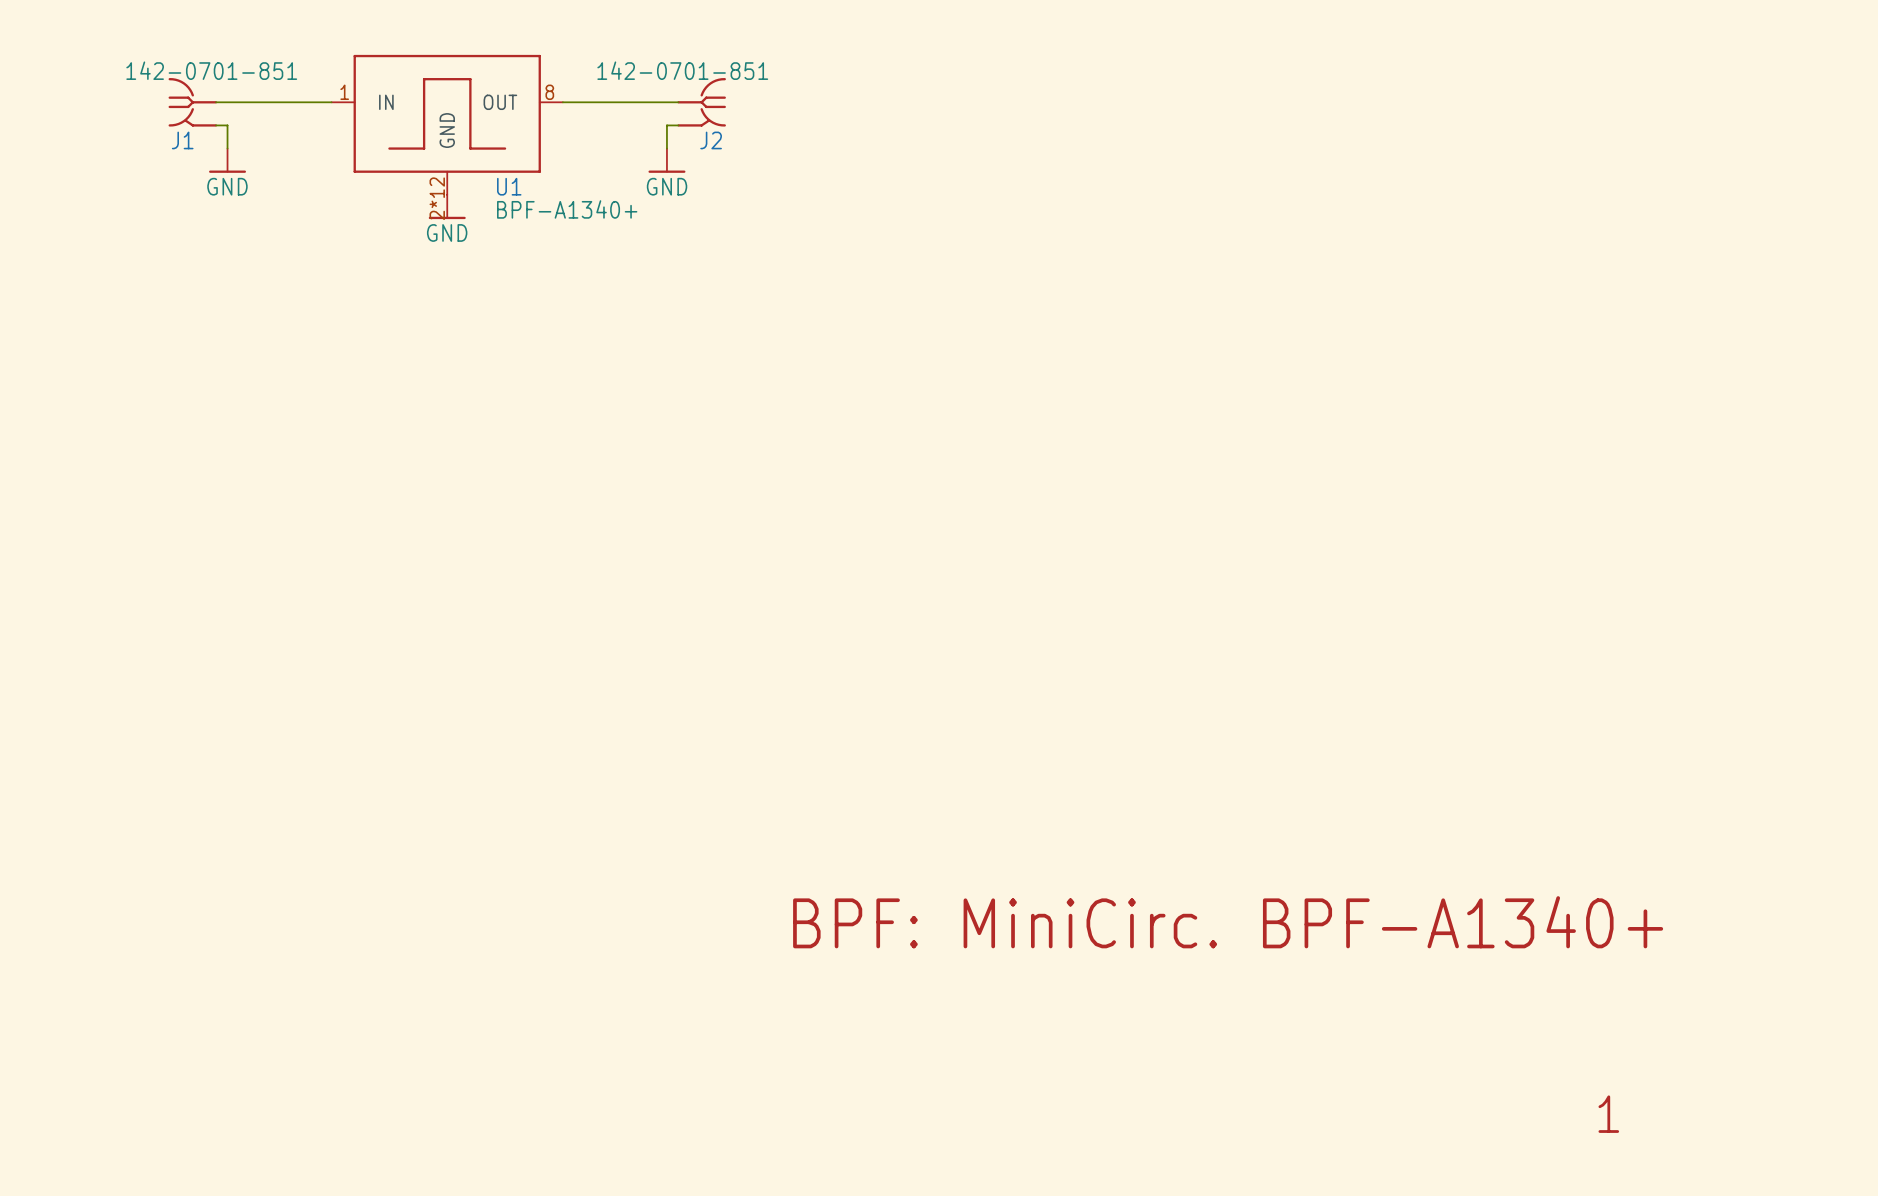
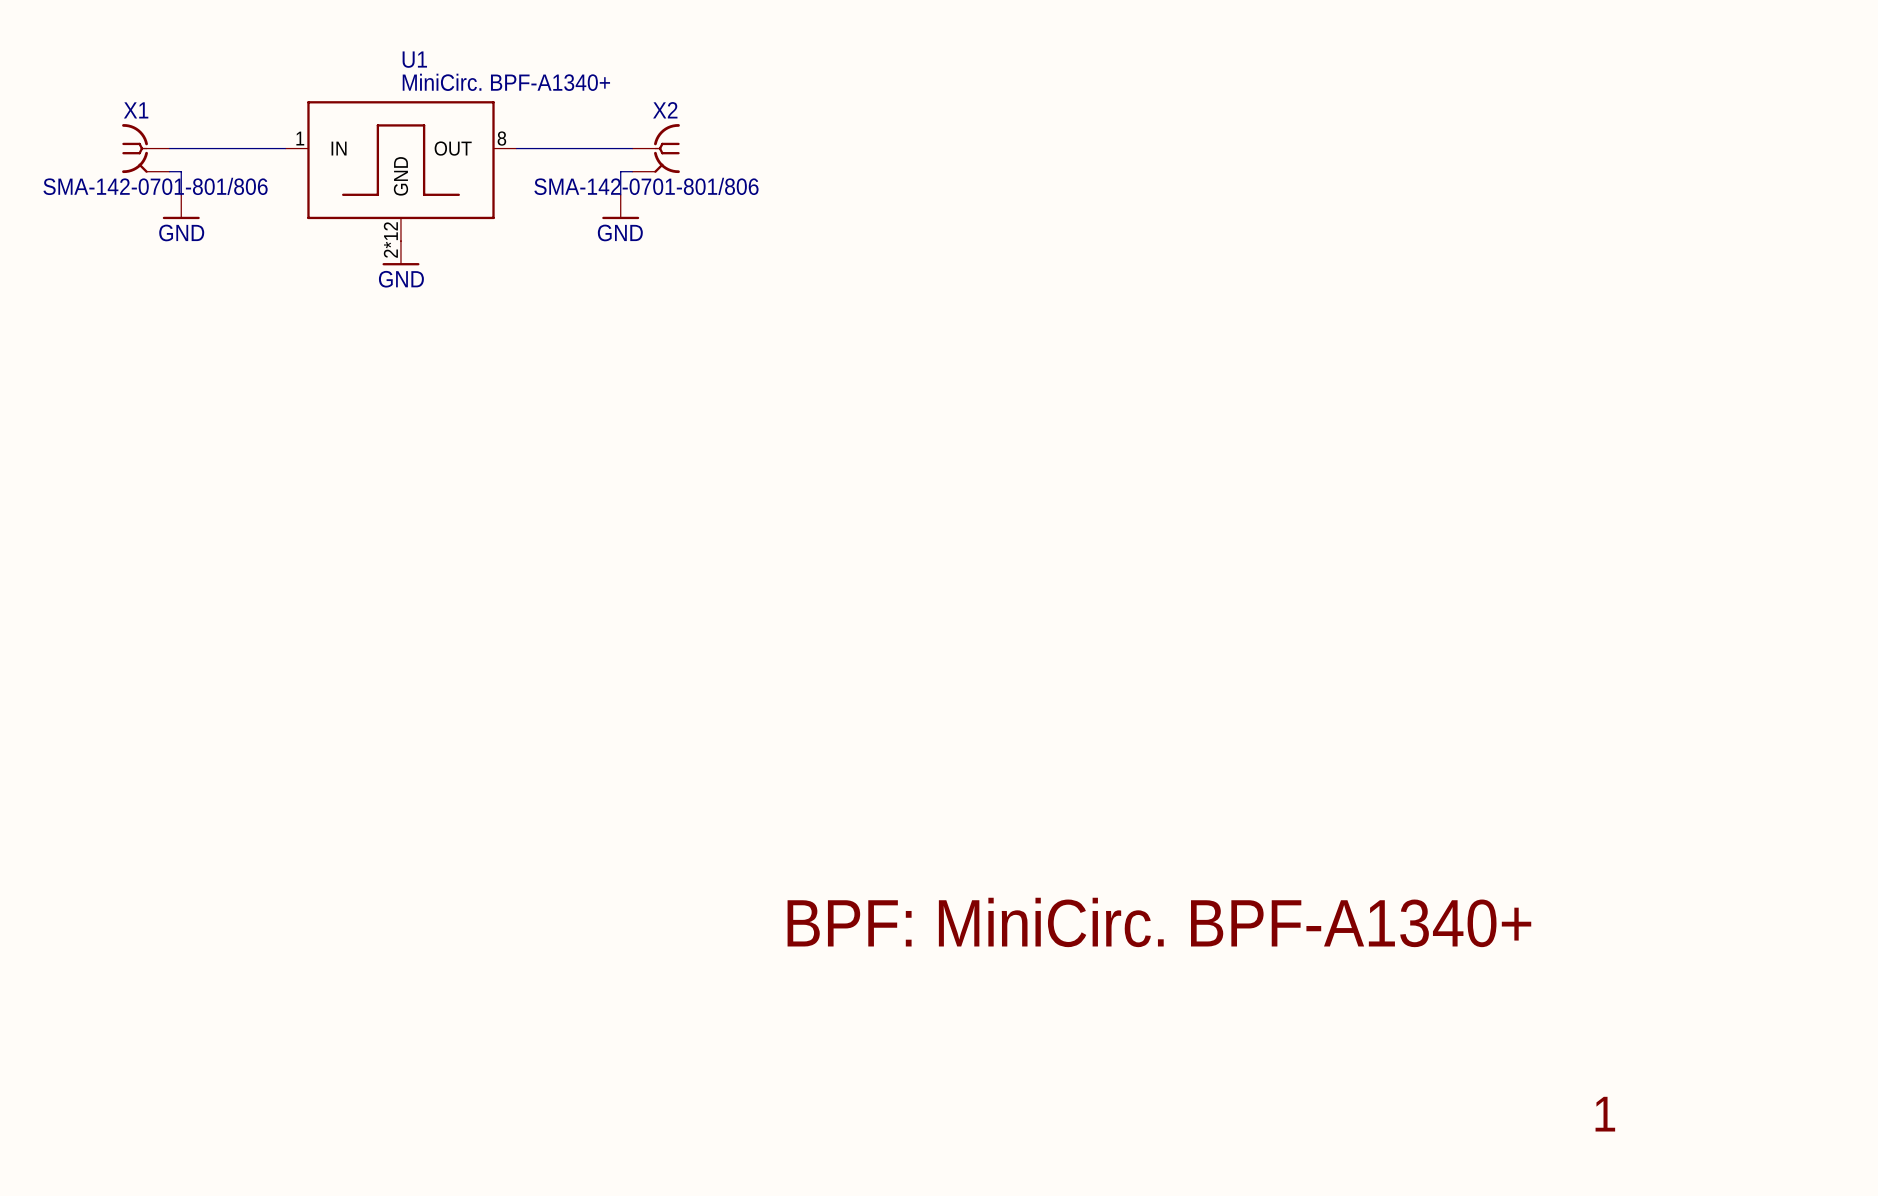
J1: 142-0701-851 (192, 102) -> none
wire: (215, 102) (331, 102) -> (169, 148) (285, 148)
wire: (562, 102) (678, 102) -> (516, 148) (632, 148)
J2: 142-0701-851 (701, 102) -> none
U1 position: (447, 124) -> (400, 171)
wire: (215, 125) (227, 125) (227, 148) -> (169, 171) (181, 171) (181, 194)
wire: (678, 125) (666, 125) (666, 148) -> (632, 171) (620, 171) (620, 194)
X1: none -> SMA-142-0701-801/806 (145, 148)
X2: none -> SMA-142-0701-801/806 (656, 148)
power symbol position: GND (227, 160) -> GND (181, 206)
power symbol position: GND (666, 160) -> GND (620, 206)
U1 name position: U1 (509, 186) -> U1 (414, 59)
power symbol position: GND (447, 206) -> GND (400, 253)
U1 value: BPF-A1340+ (567, 209) -> MiniCirc. BPF-A1340+ (506, 82)

